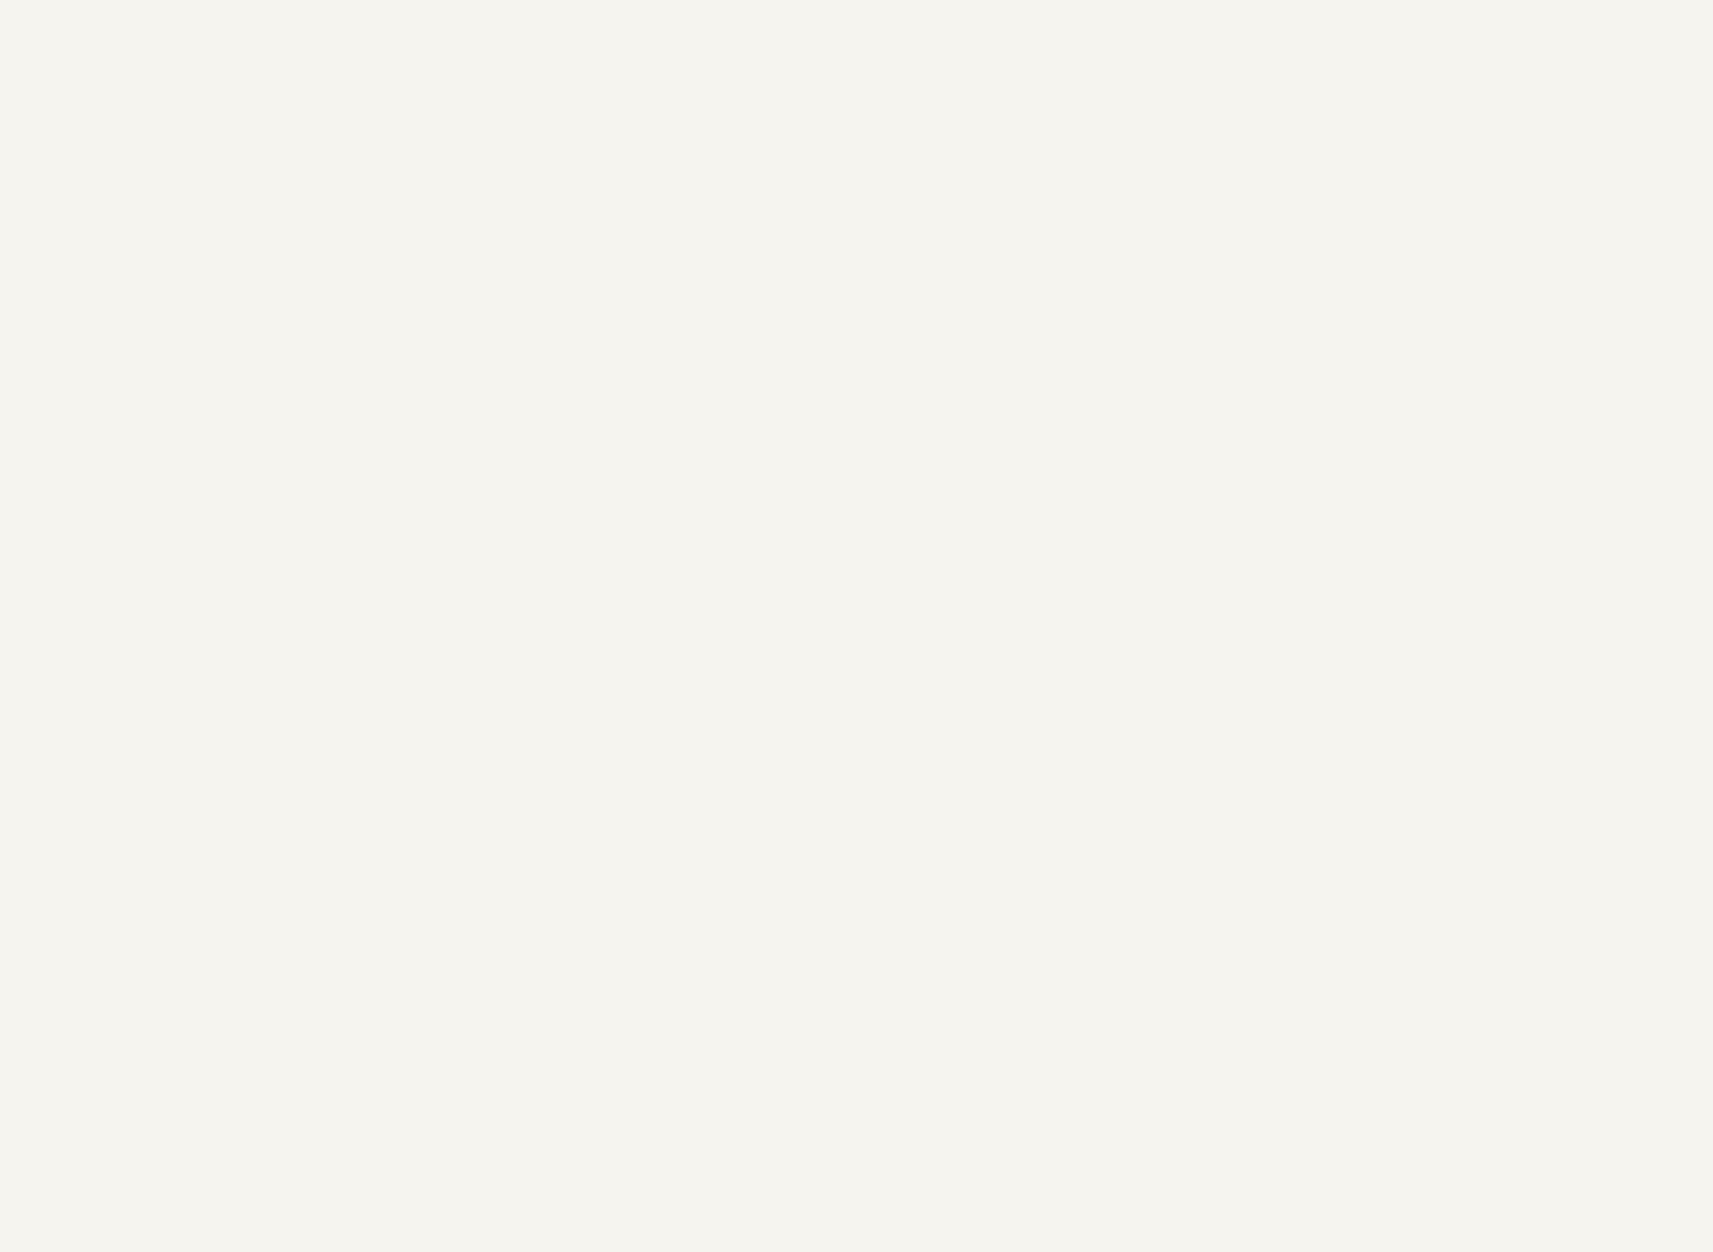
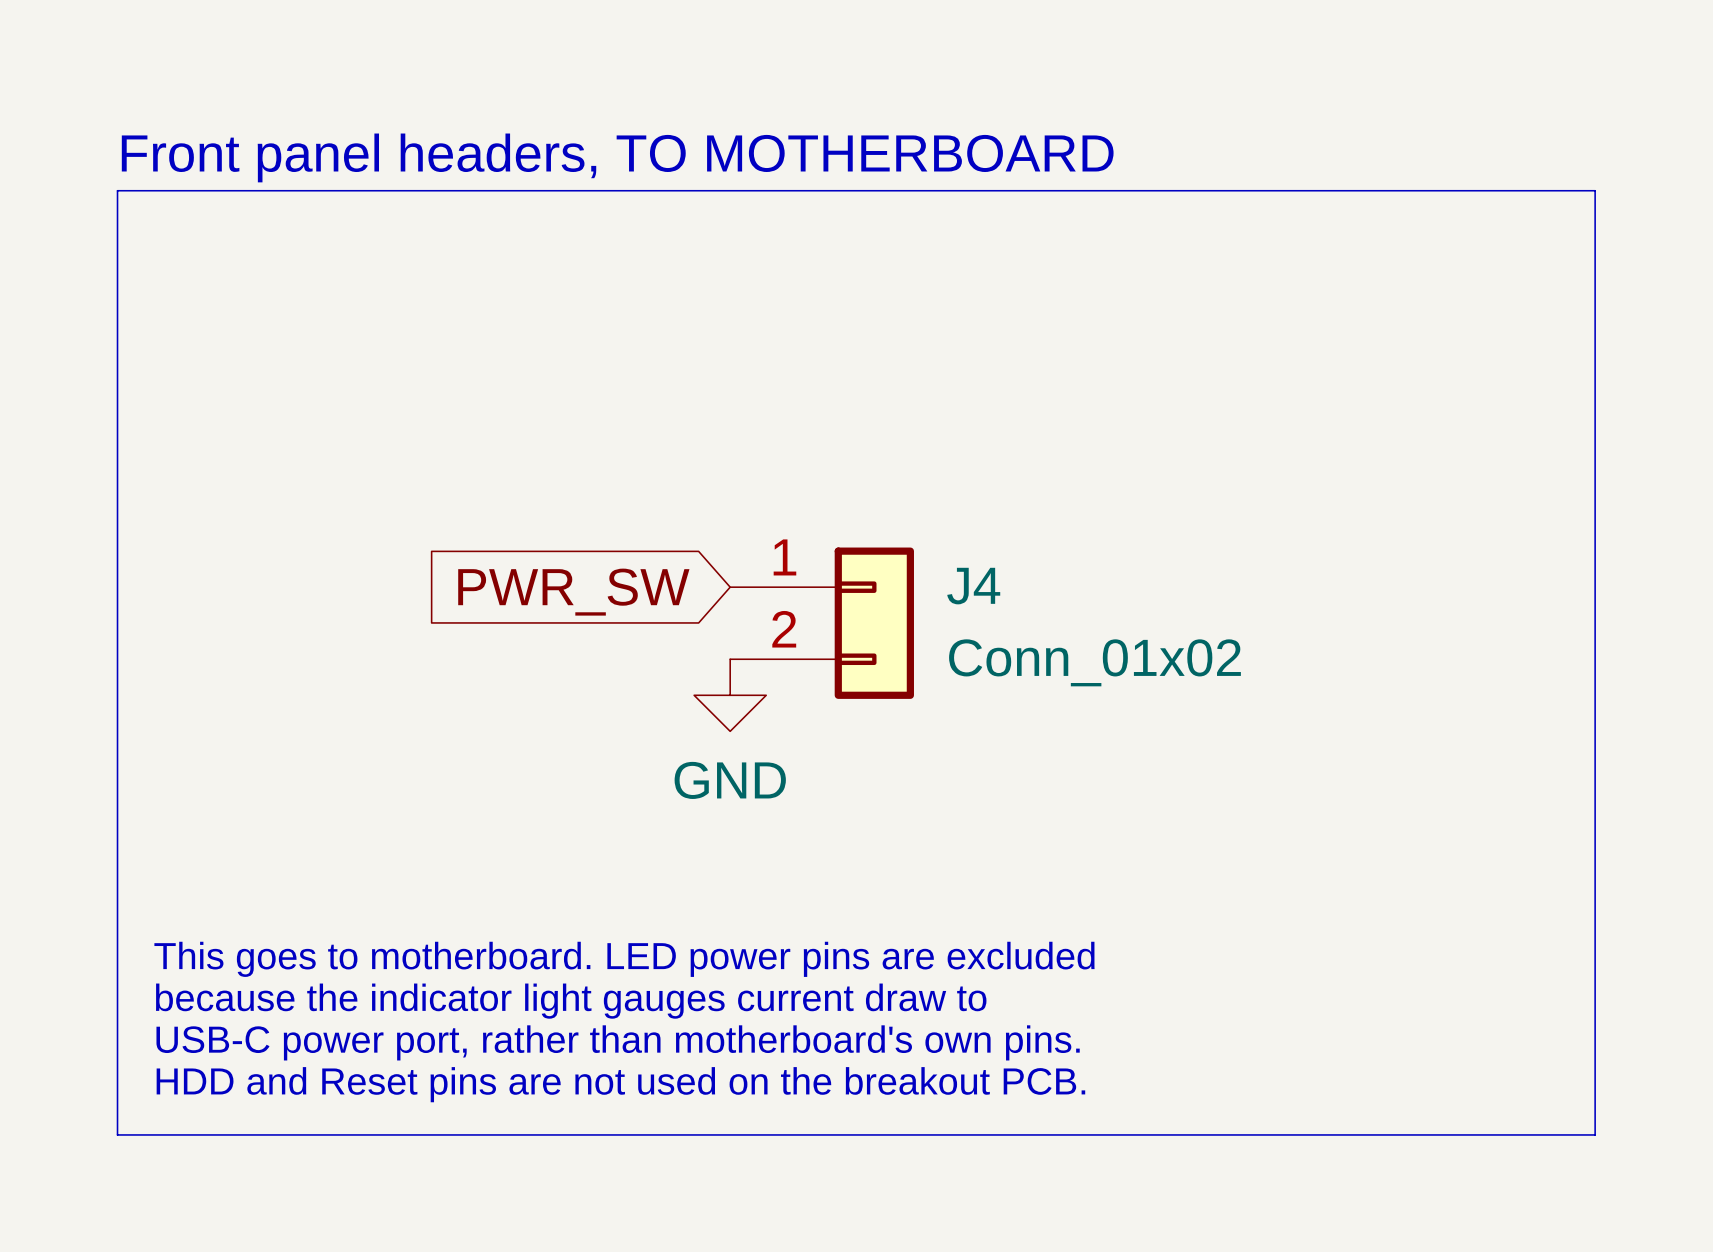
text: none -> Front panel headers, TO MOTHERBOARD (617, 157)
line: none -> (117, 190) (1595, 190) (1595, 1134) (117, 1134) (117, 190)
global label: none -> PWR_SW (573, 592)
J4: none -> Conn_01x02 (822, 623)
power symbol: none -> GND (730, 695)
text: none -> This goes to motherboard. LED power pins are excluded (624, 959)
text: none -> because the indicator light gauges current draw to (571, 1001)
text: none -> USB-C power port, rather than motherboard's own pins. (618, 1042)
text: none -> HDD and Reset pins are not used on the breakout PCB. (620, 1084)

